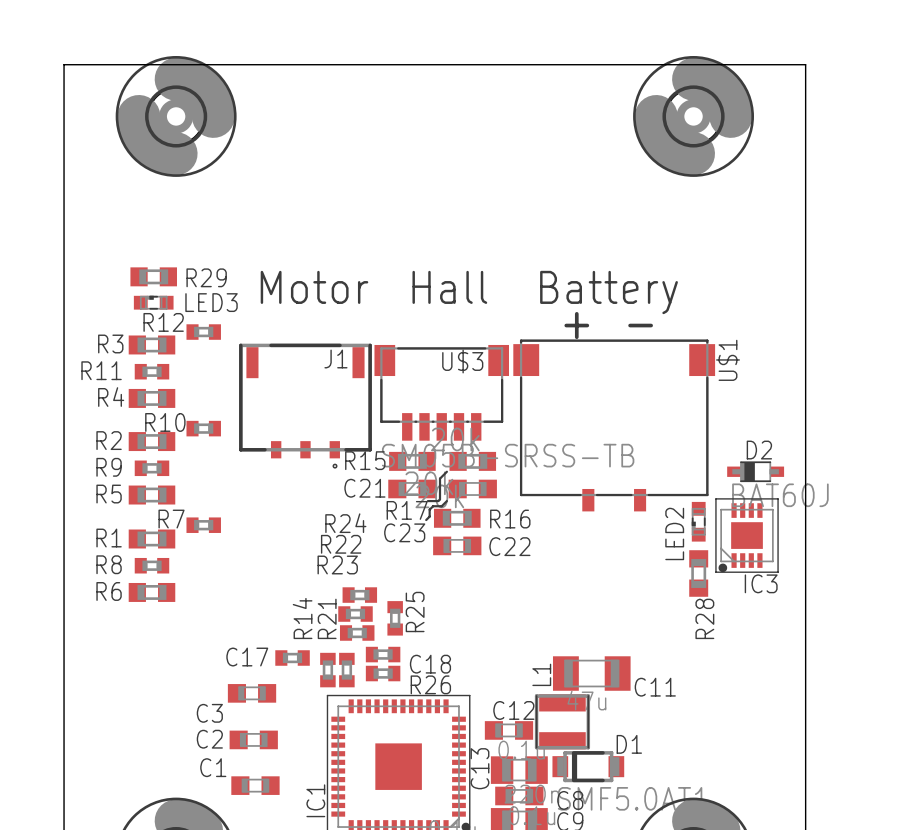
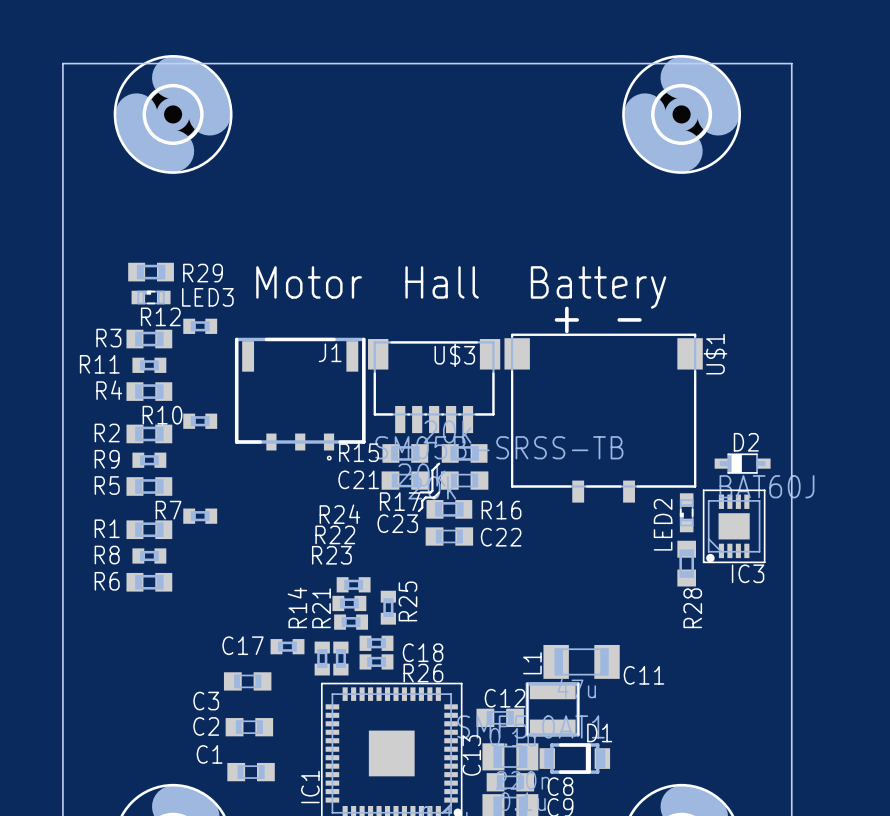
D1 rotation: 0° (588, 766) -> 180° (574, 758)

